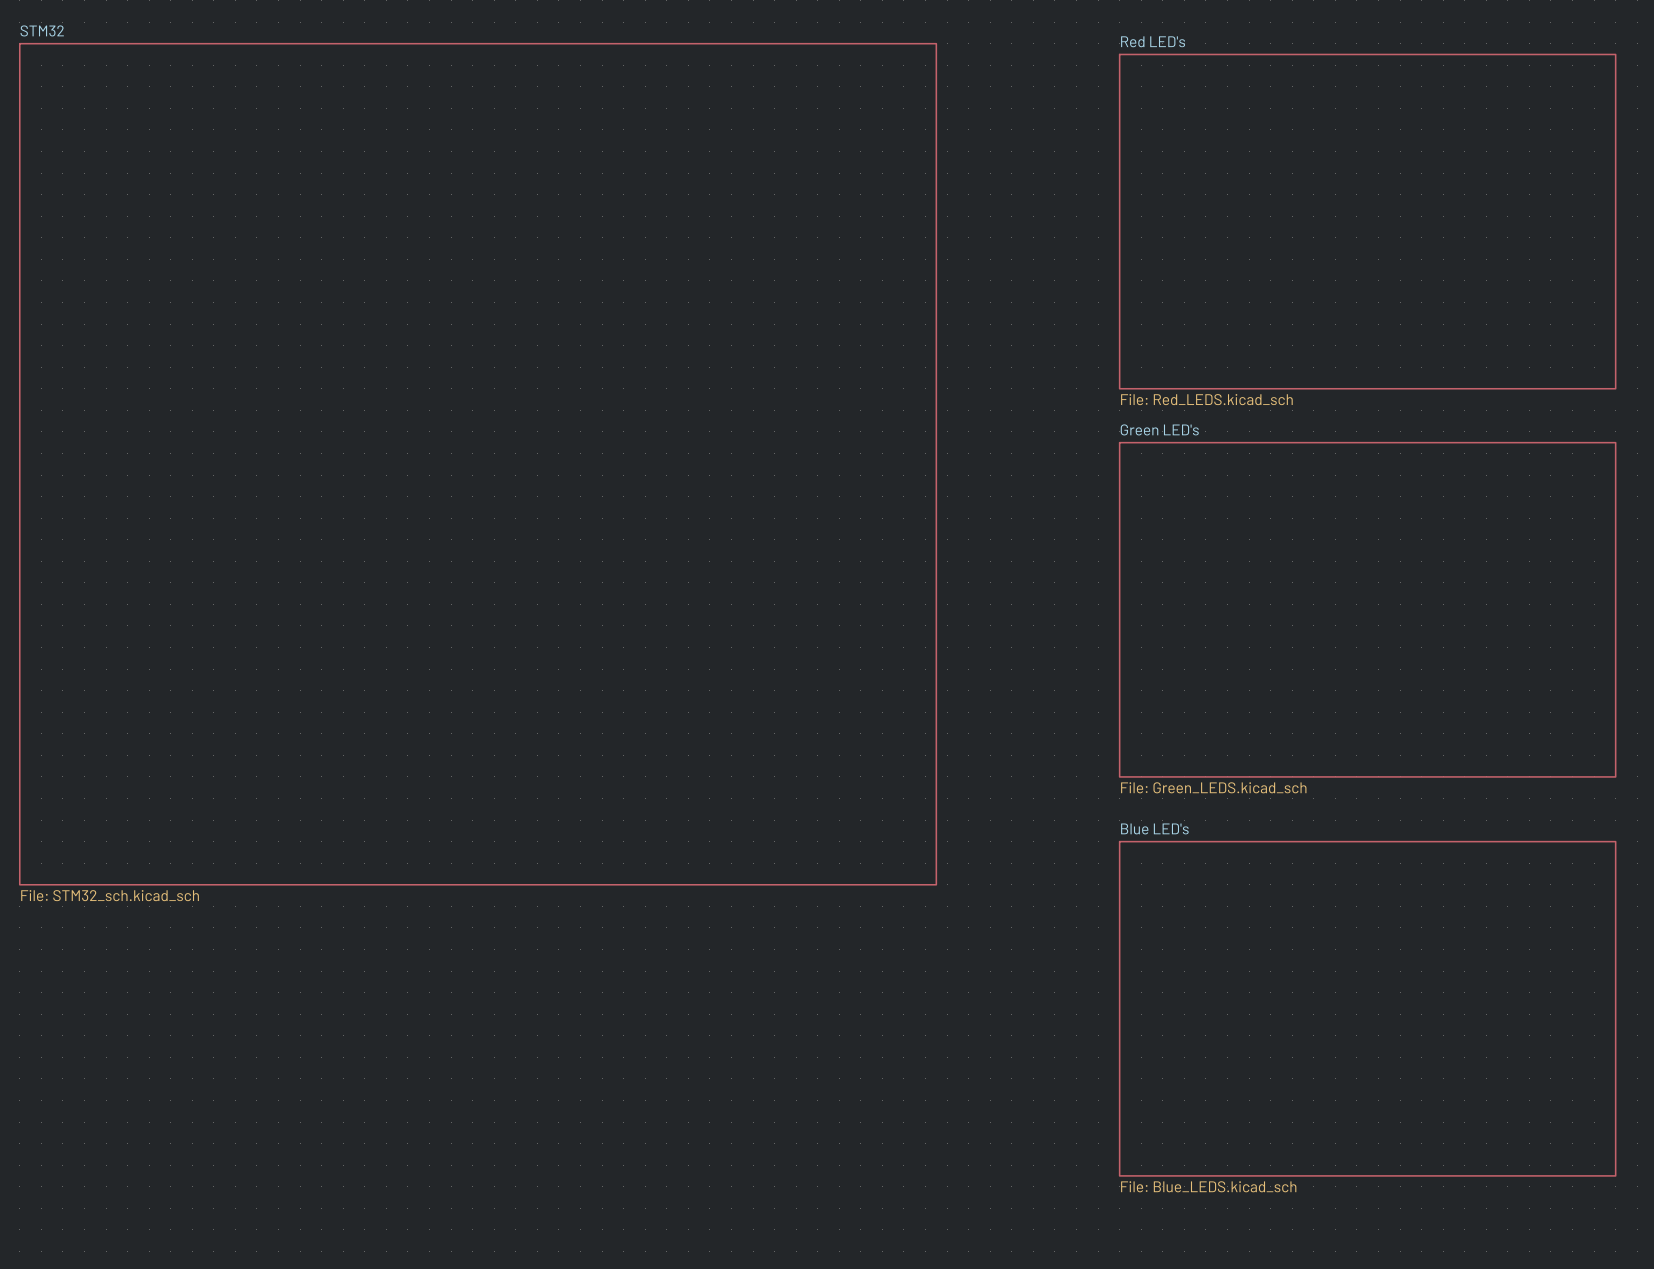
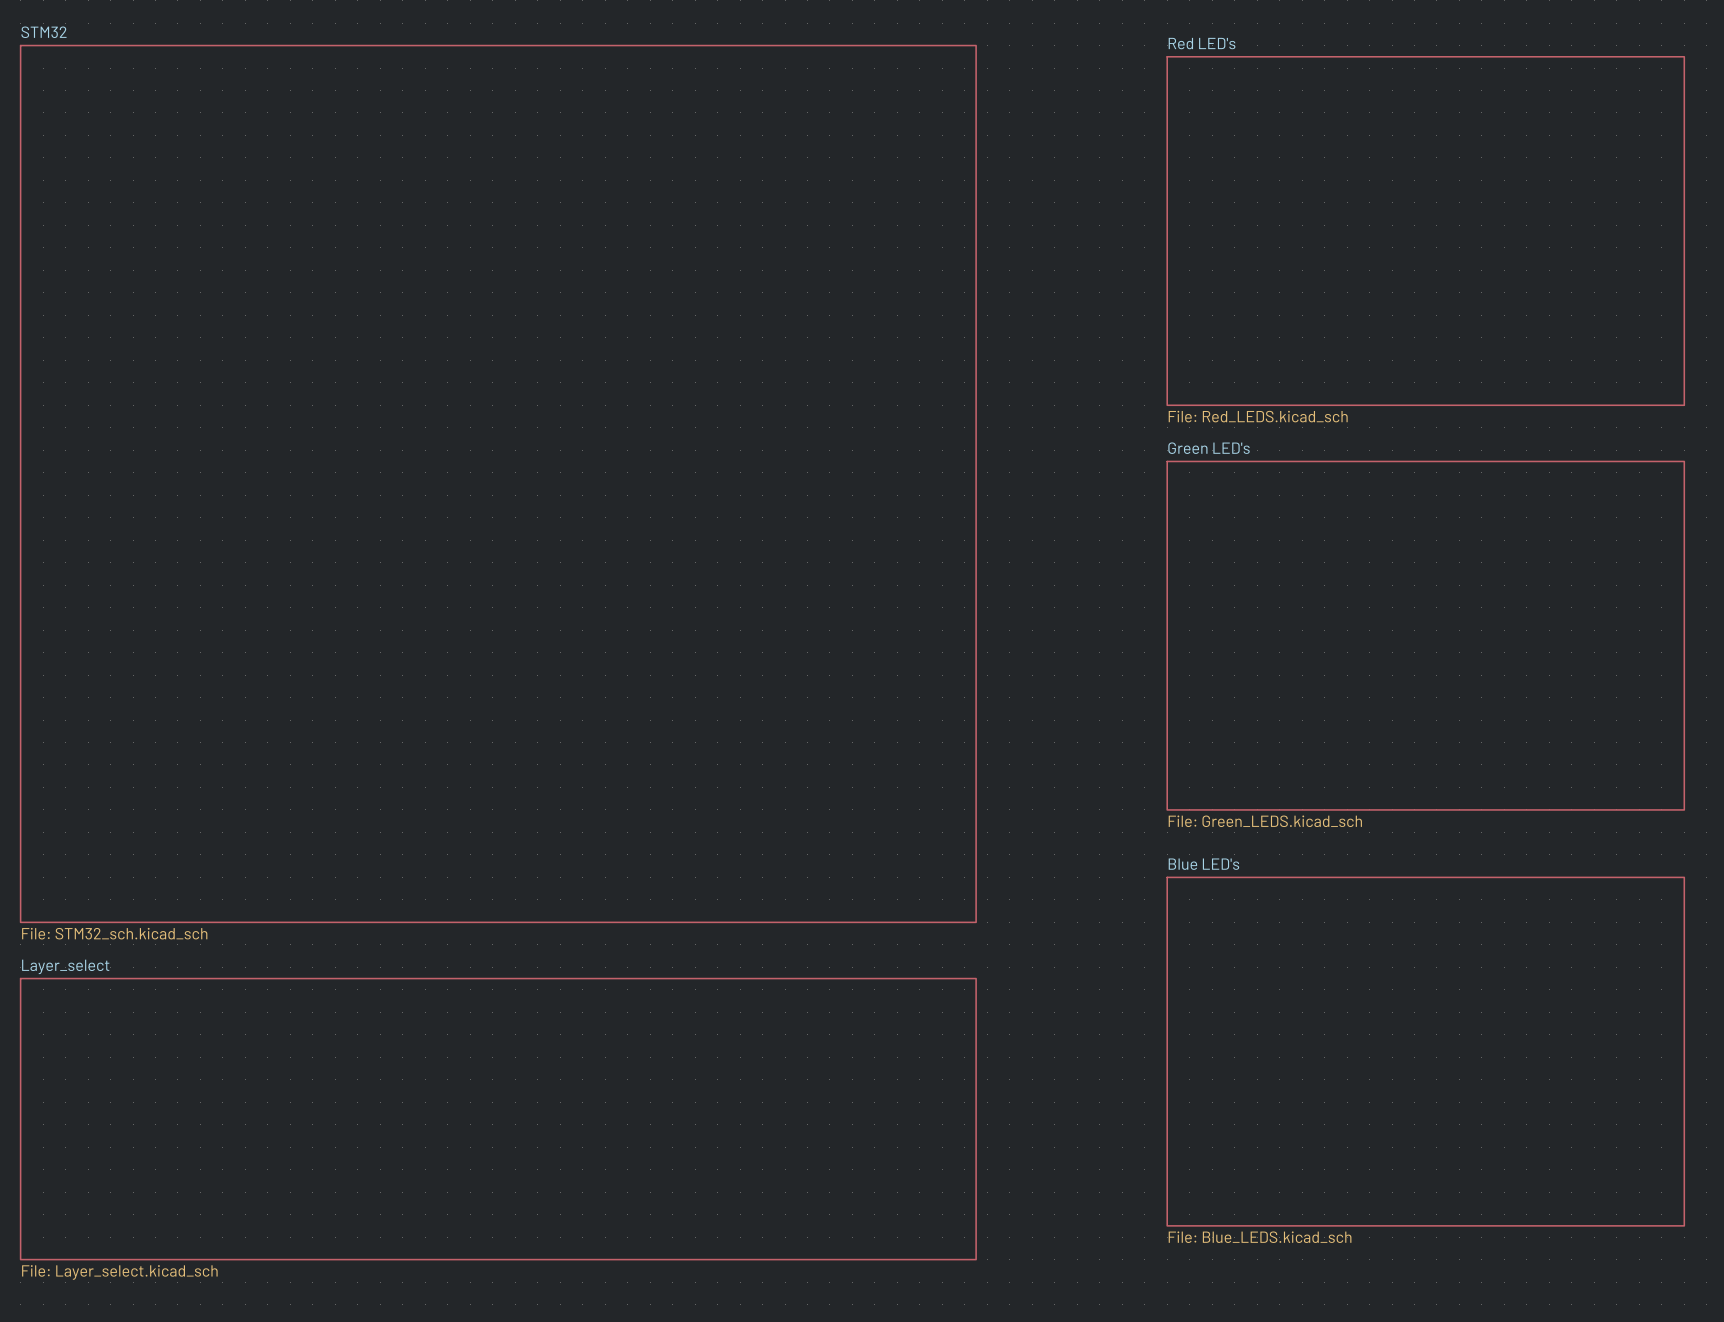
sheet Layer_select: none -> File: Layer_select.kicad_sch (498, 1119)

